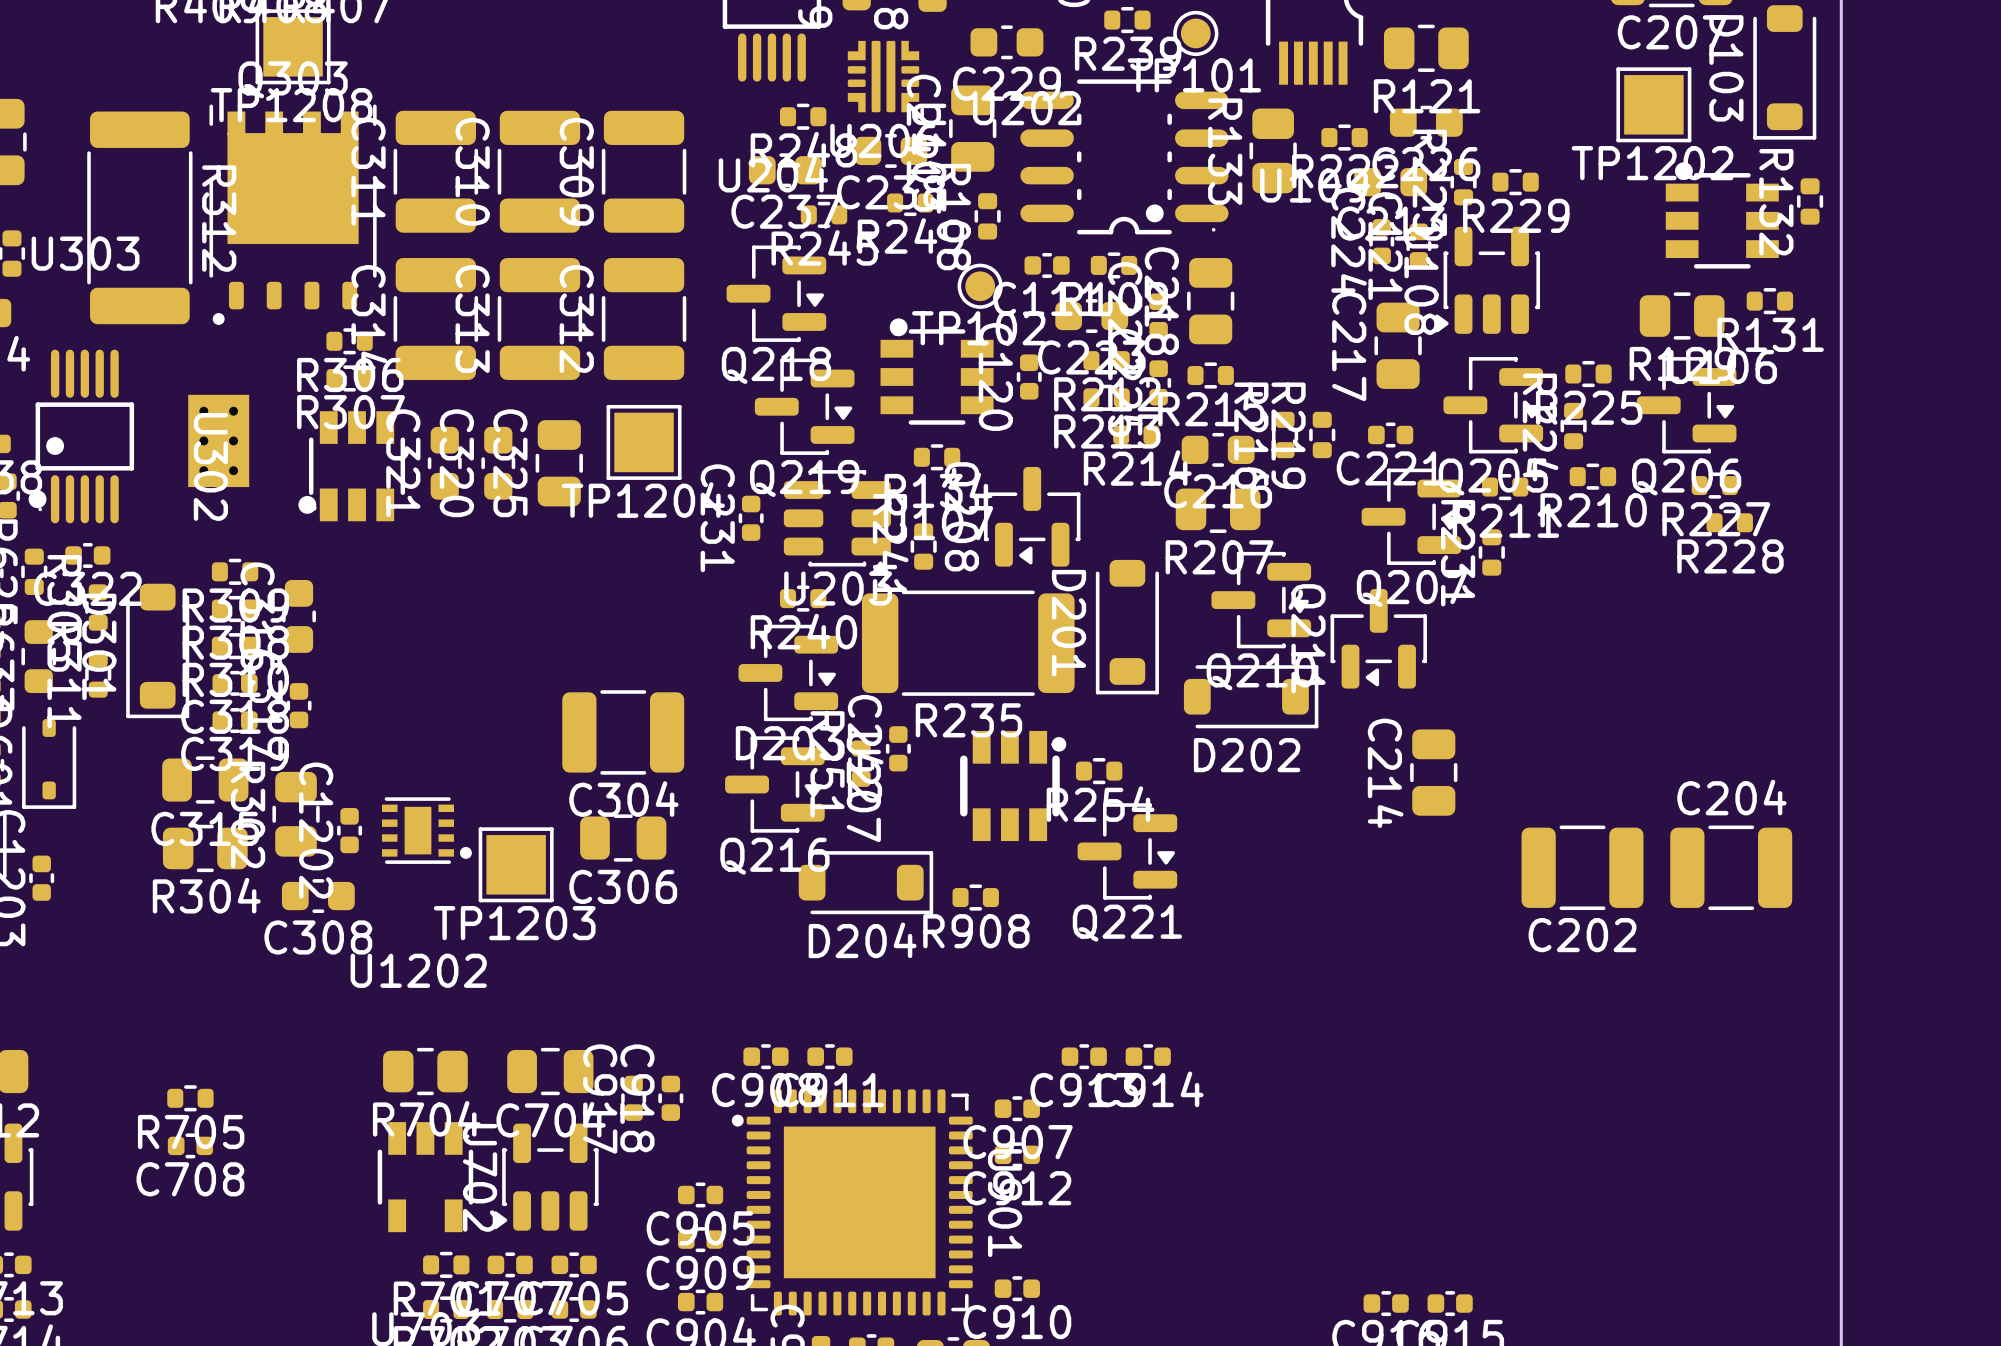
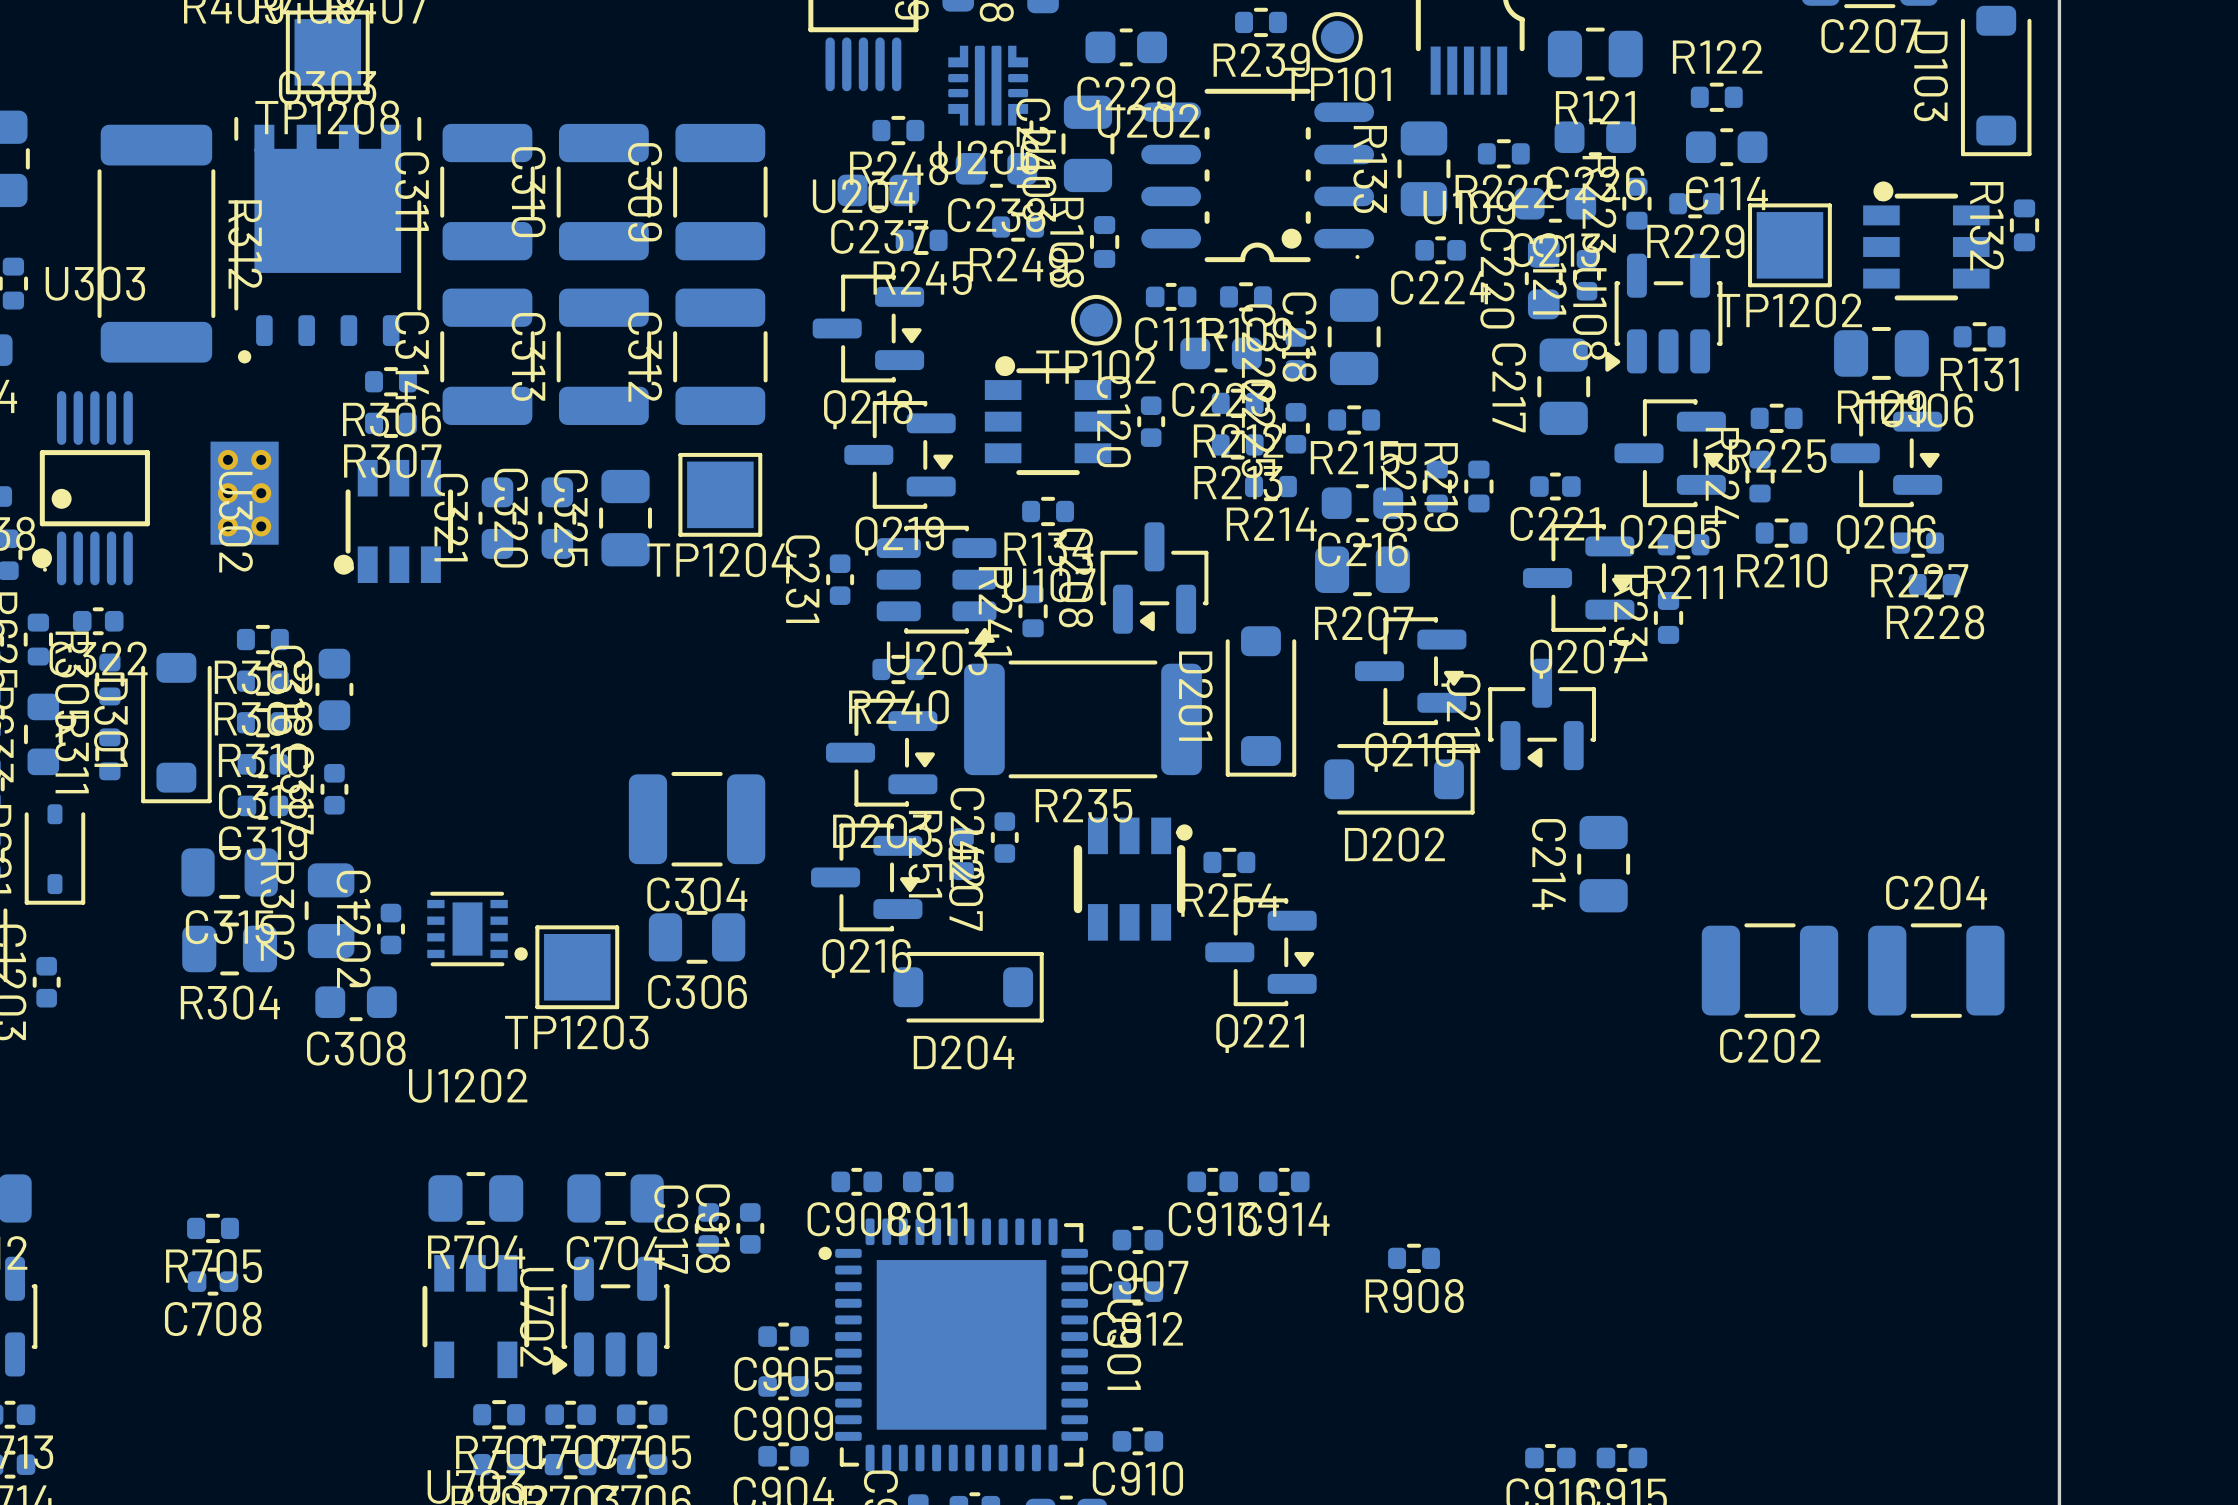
R122: none -> (1716, 97)
TP1202 position: (1653, 104) -> (1789, 245)
C114: none -> (1726, 147)
C224 rotation: 0° (1381, 241) -> 90° clockwise (1440, 250)
C224 position: (1381, 241) -> (1440, 250)
C220: none -> (1543, 278)
R908 position: (975, 897) -> (1414, 1258)

